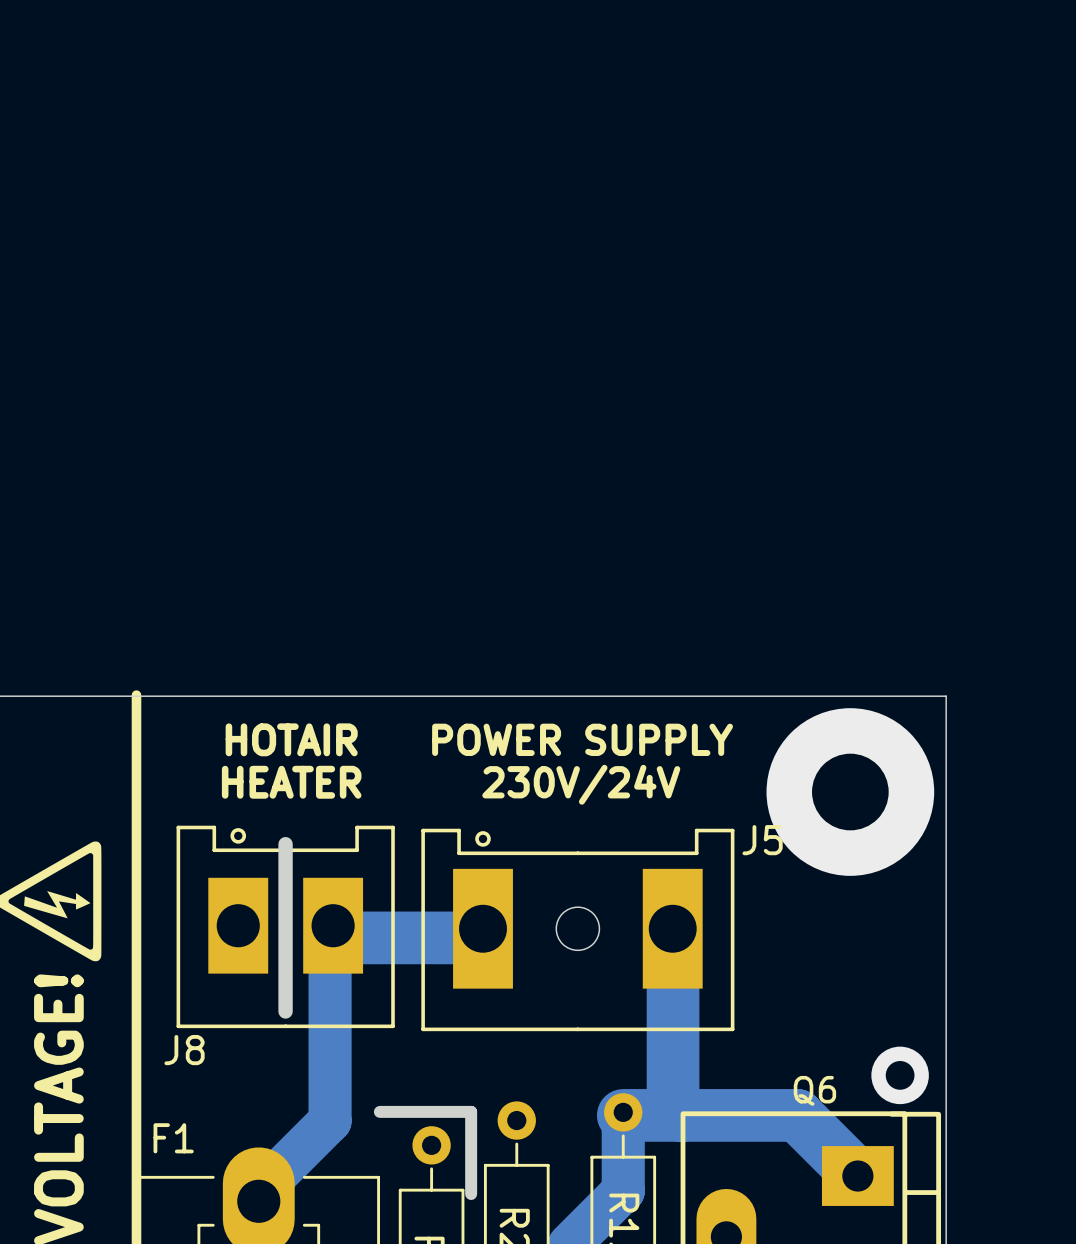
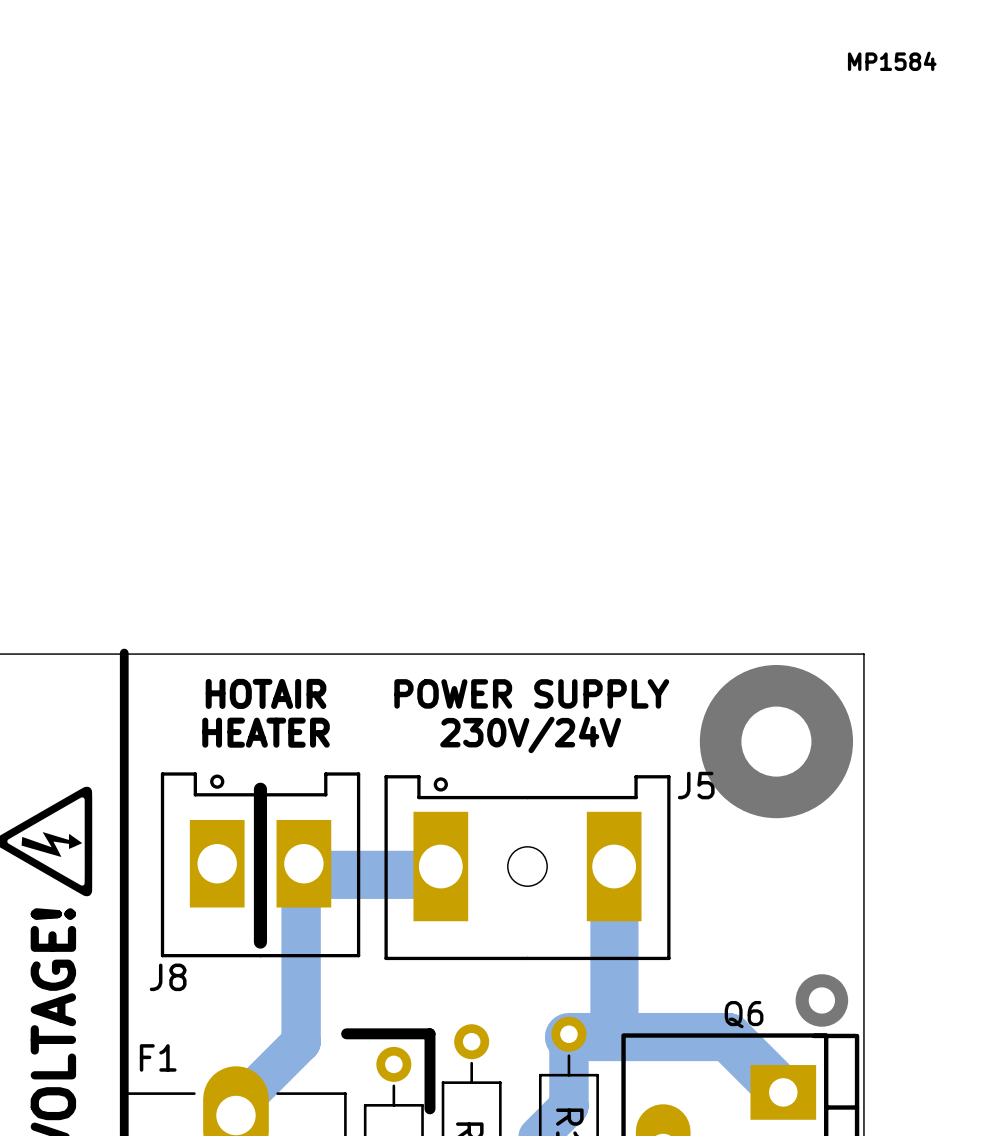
part text: none -> MP1584 (892, 61)

